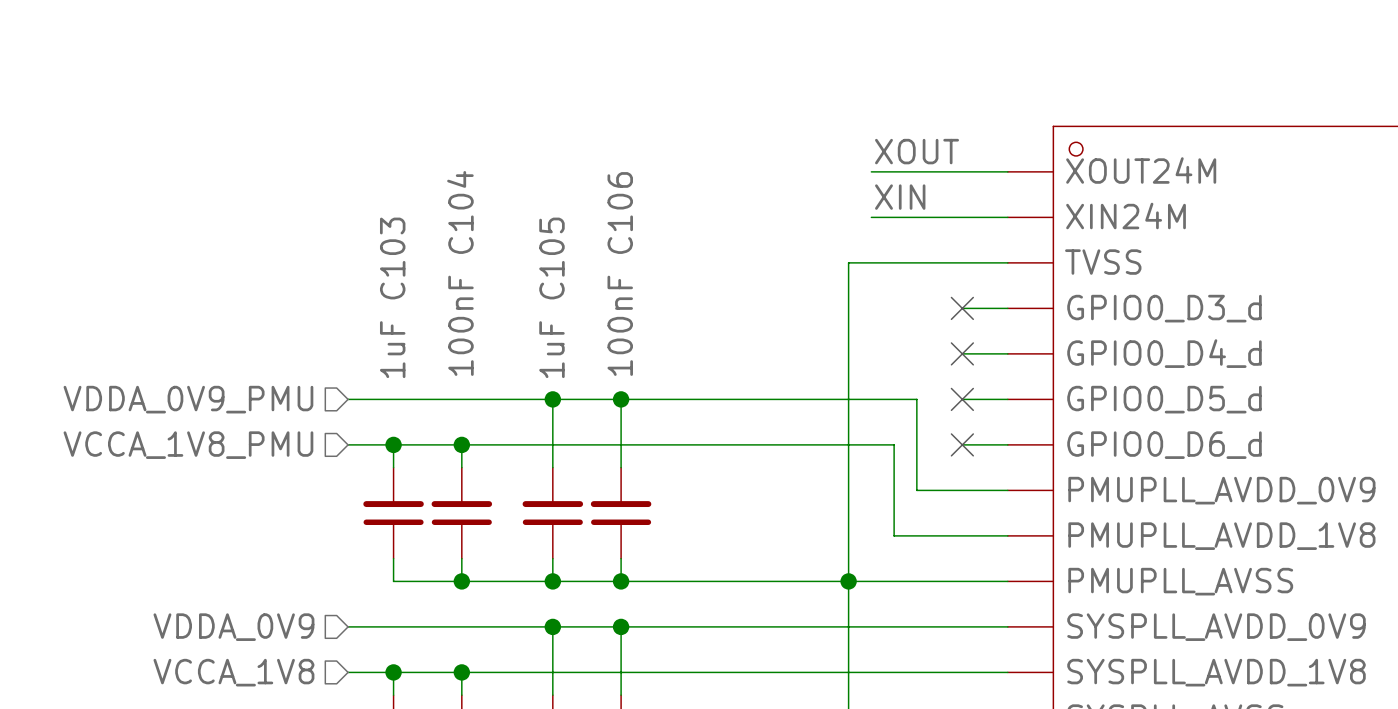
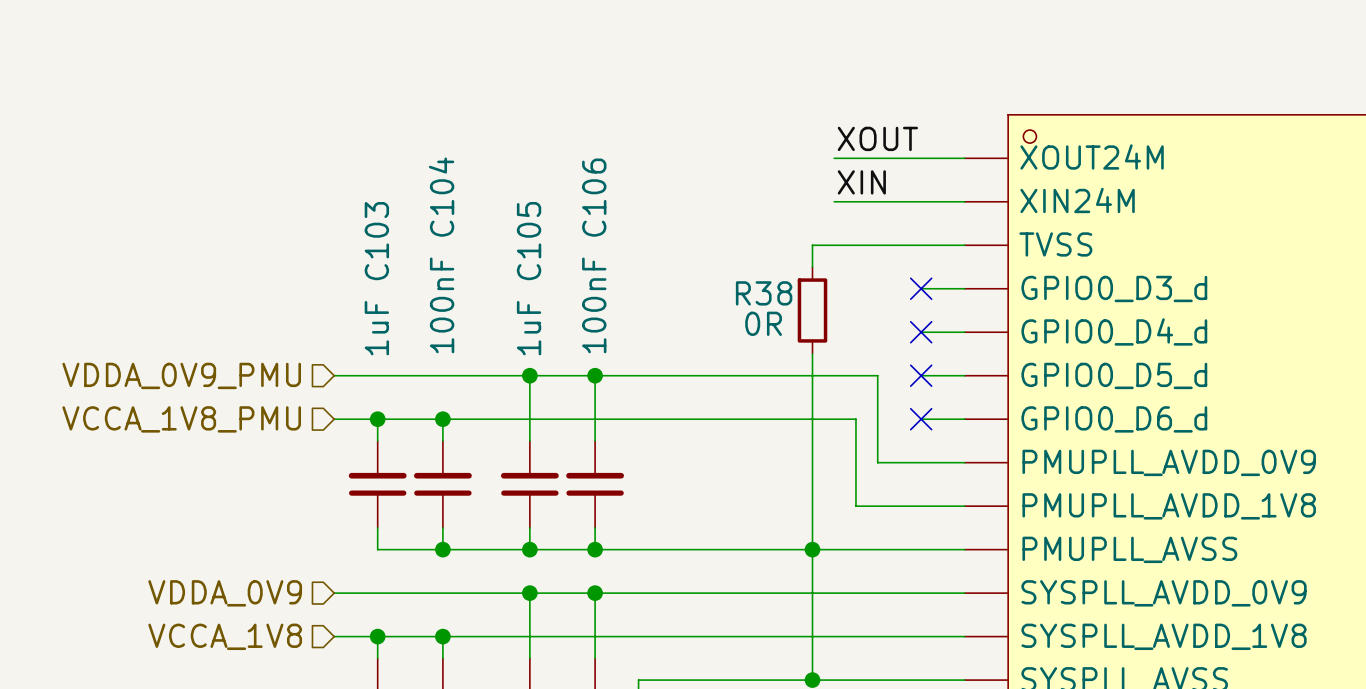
wire: (848, 285) (848, 376) -> none
R38: none -> 0R (812, 310)

